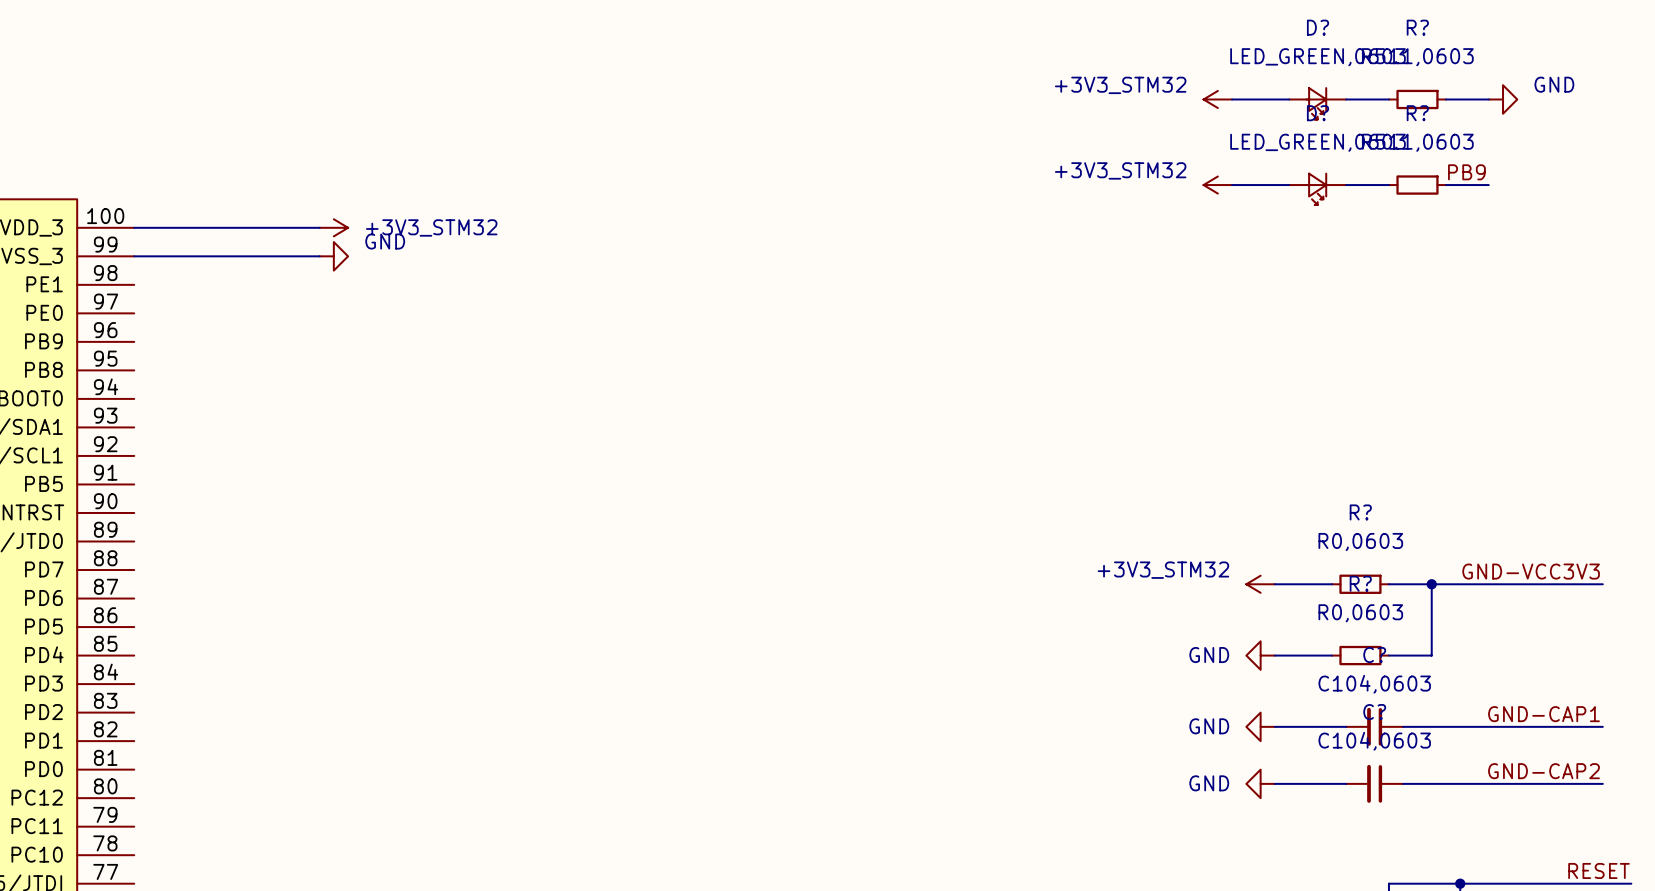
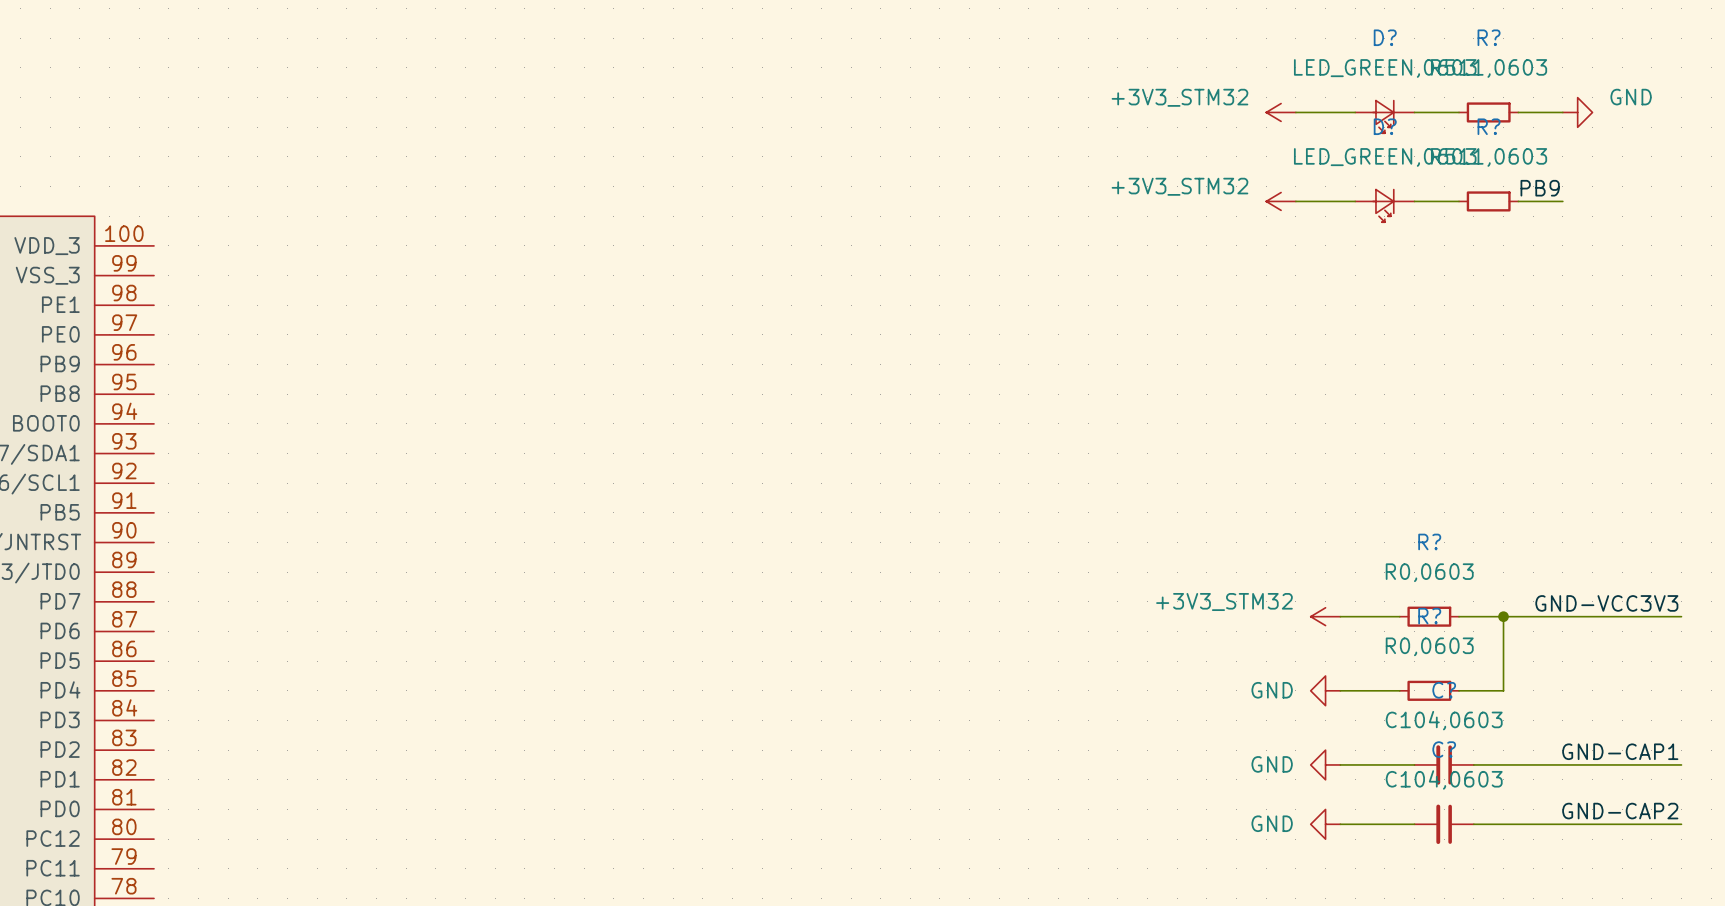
wire: (134, 227) (319, 227) -> none
power symbol: +3V3_STM32 (333, 227) -> none
wire: (134, 256) (319, 256) -> none
power symbol: GND (333, 256) -> none

